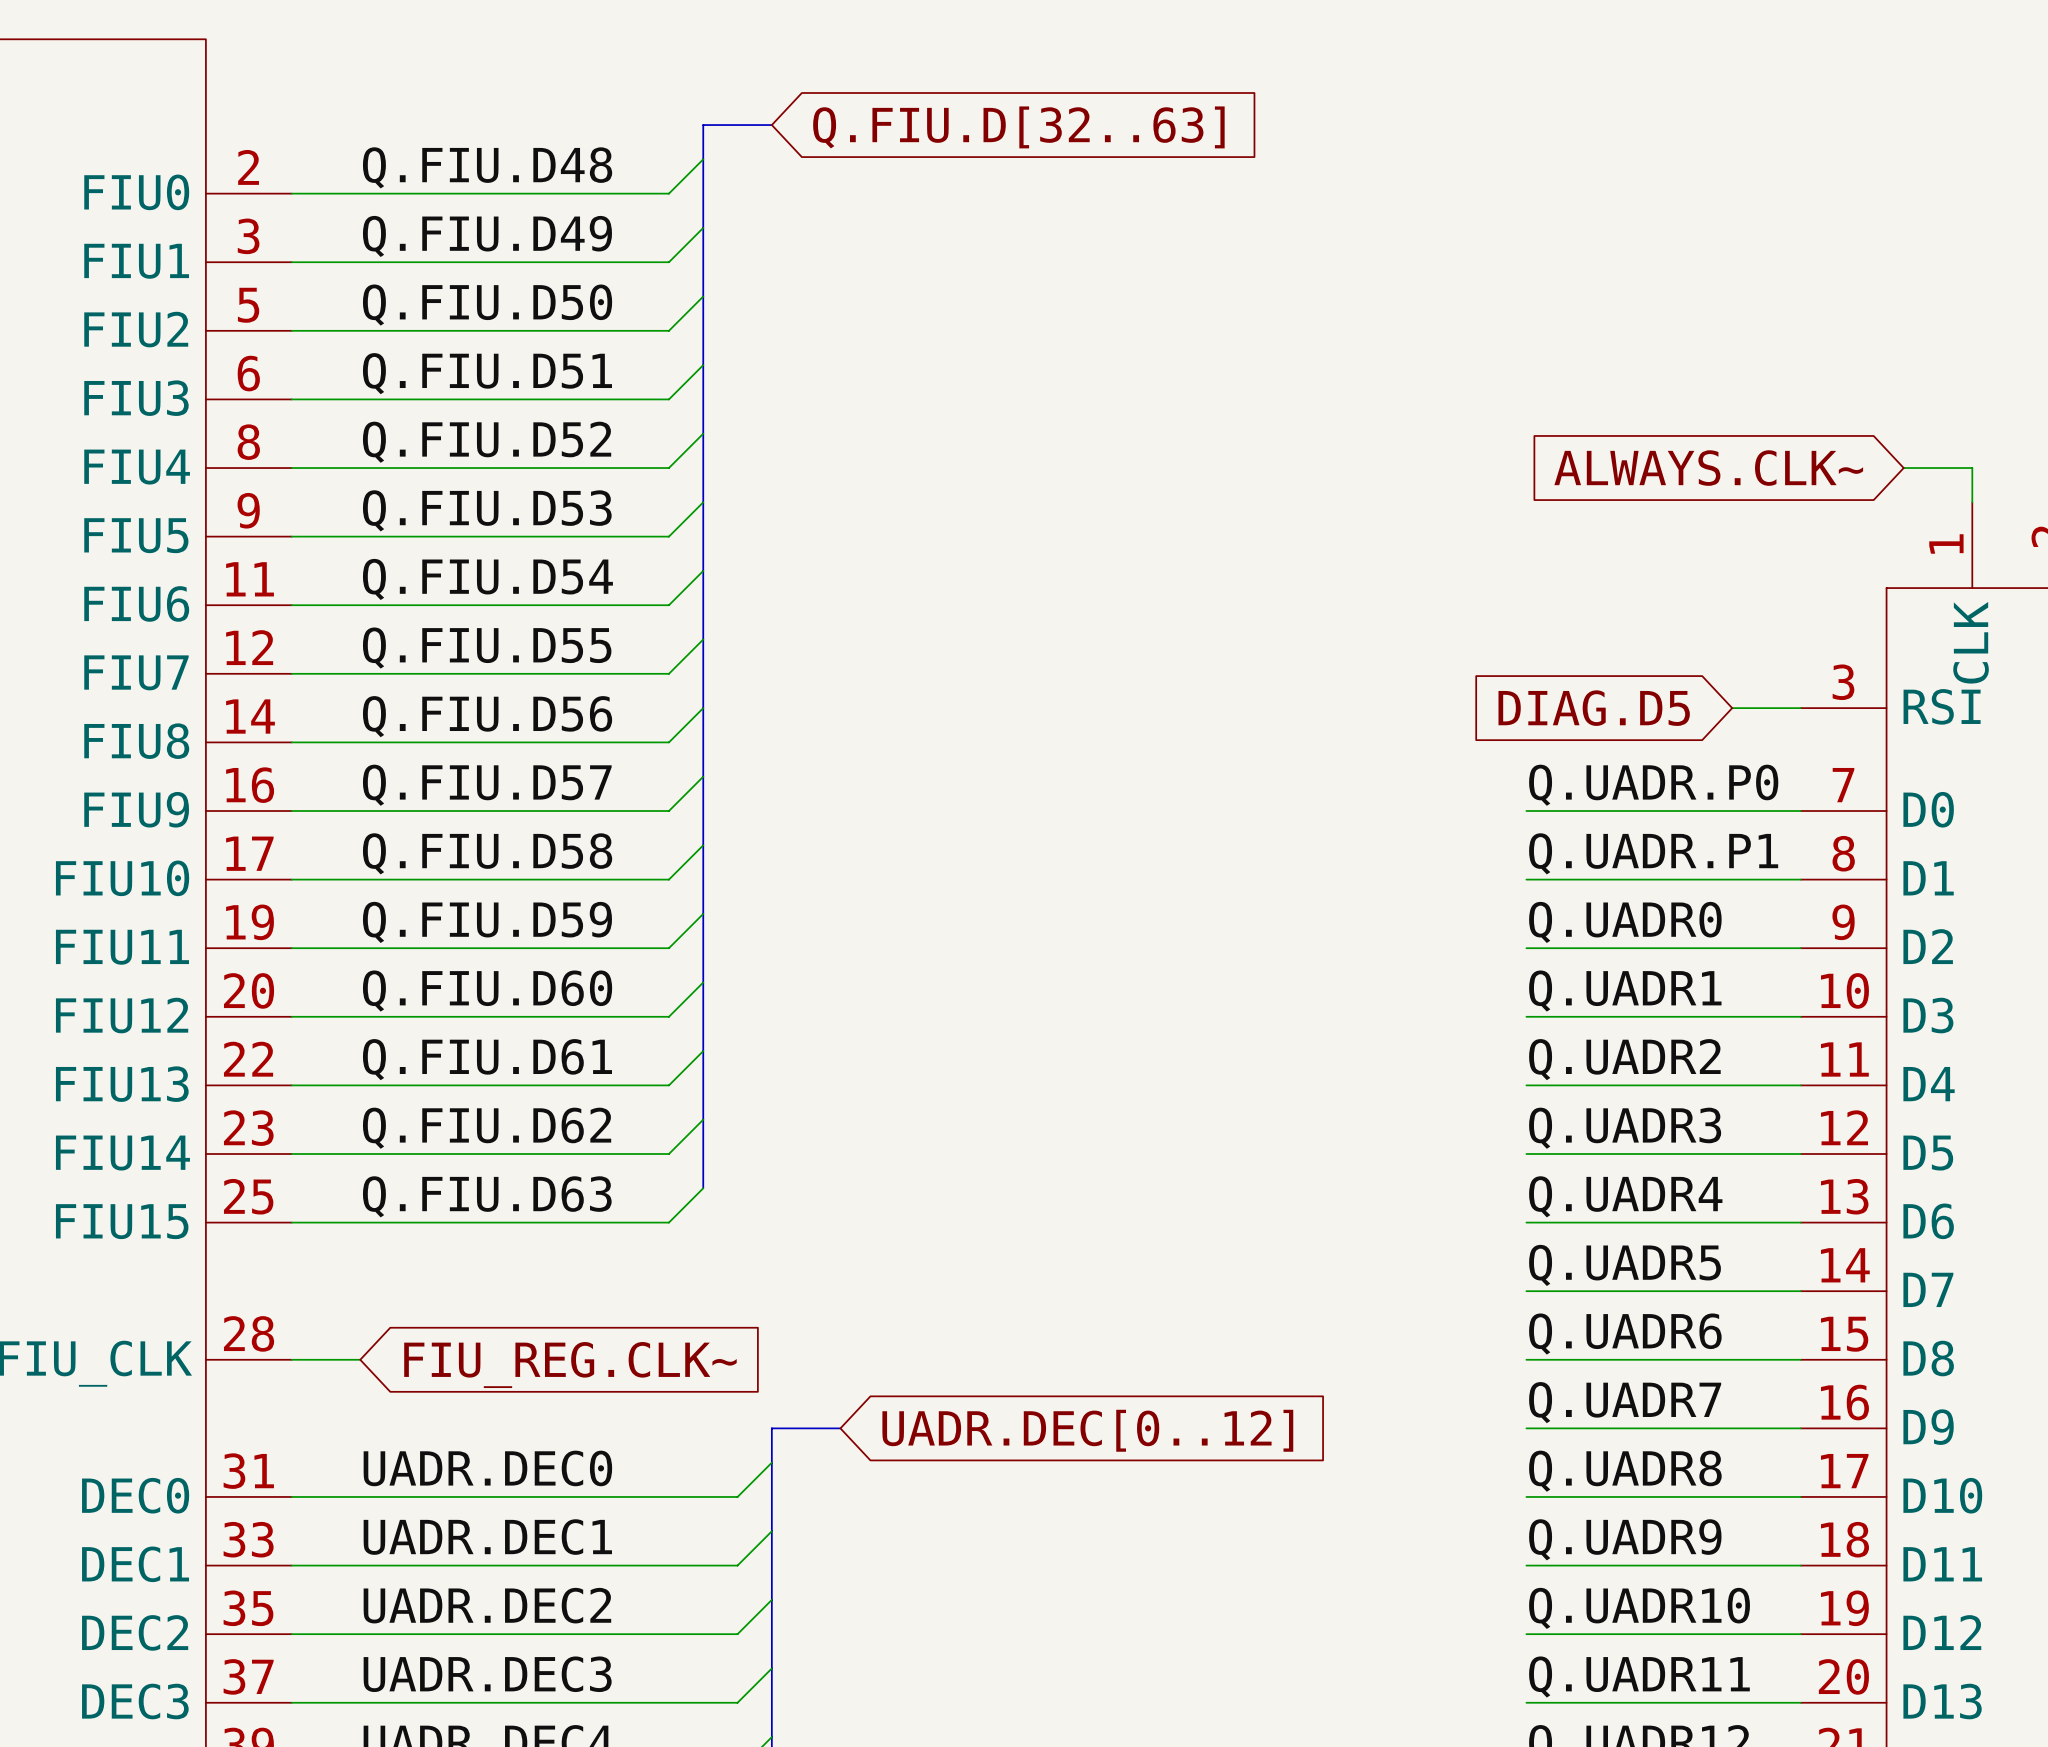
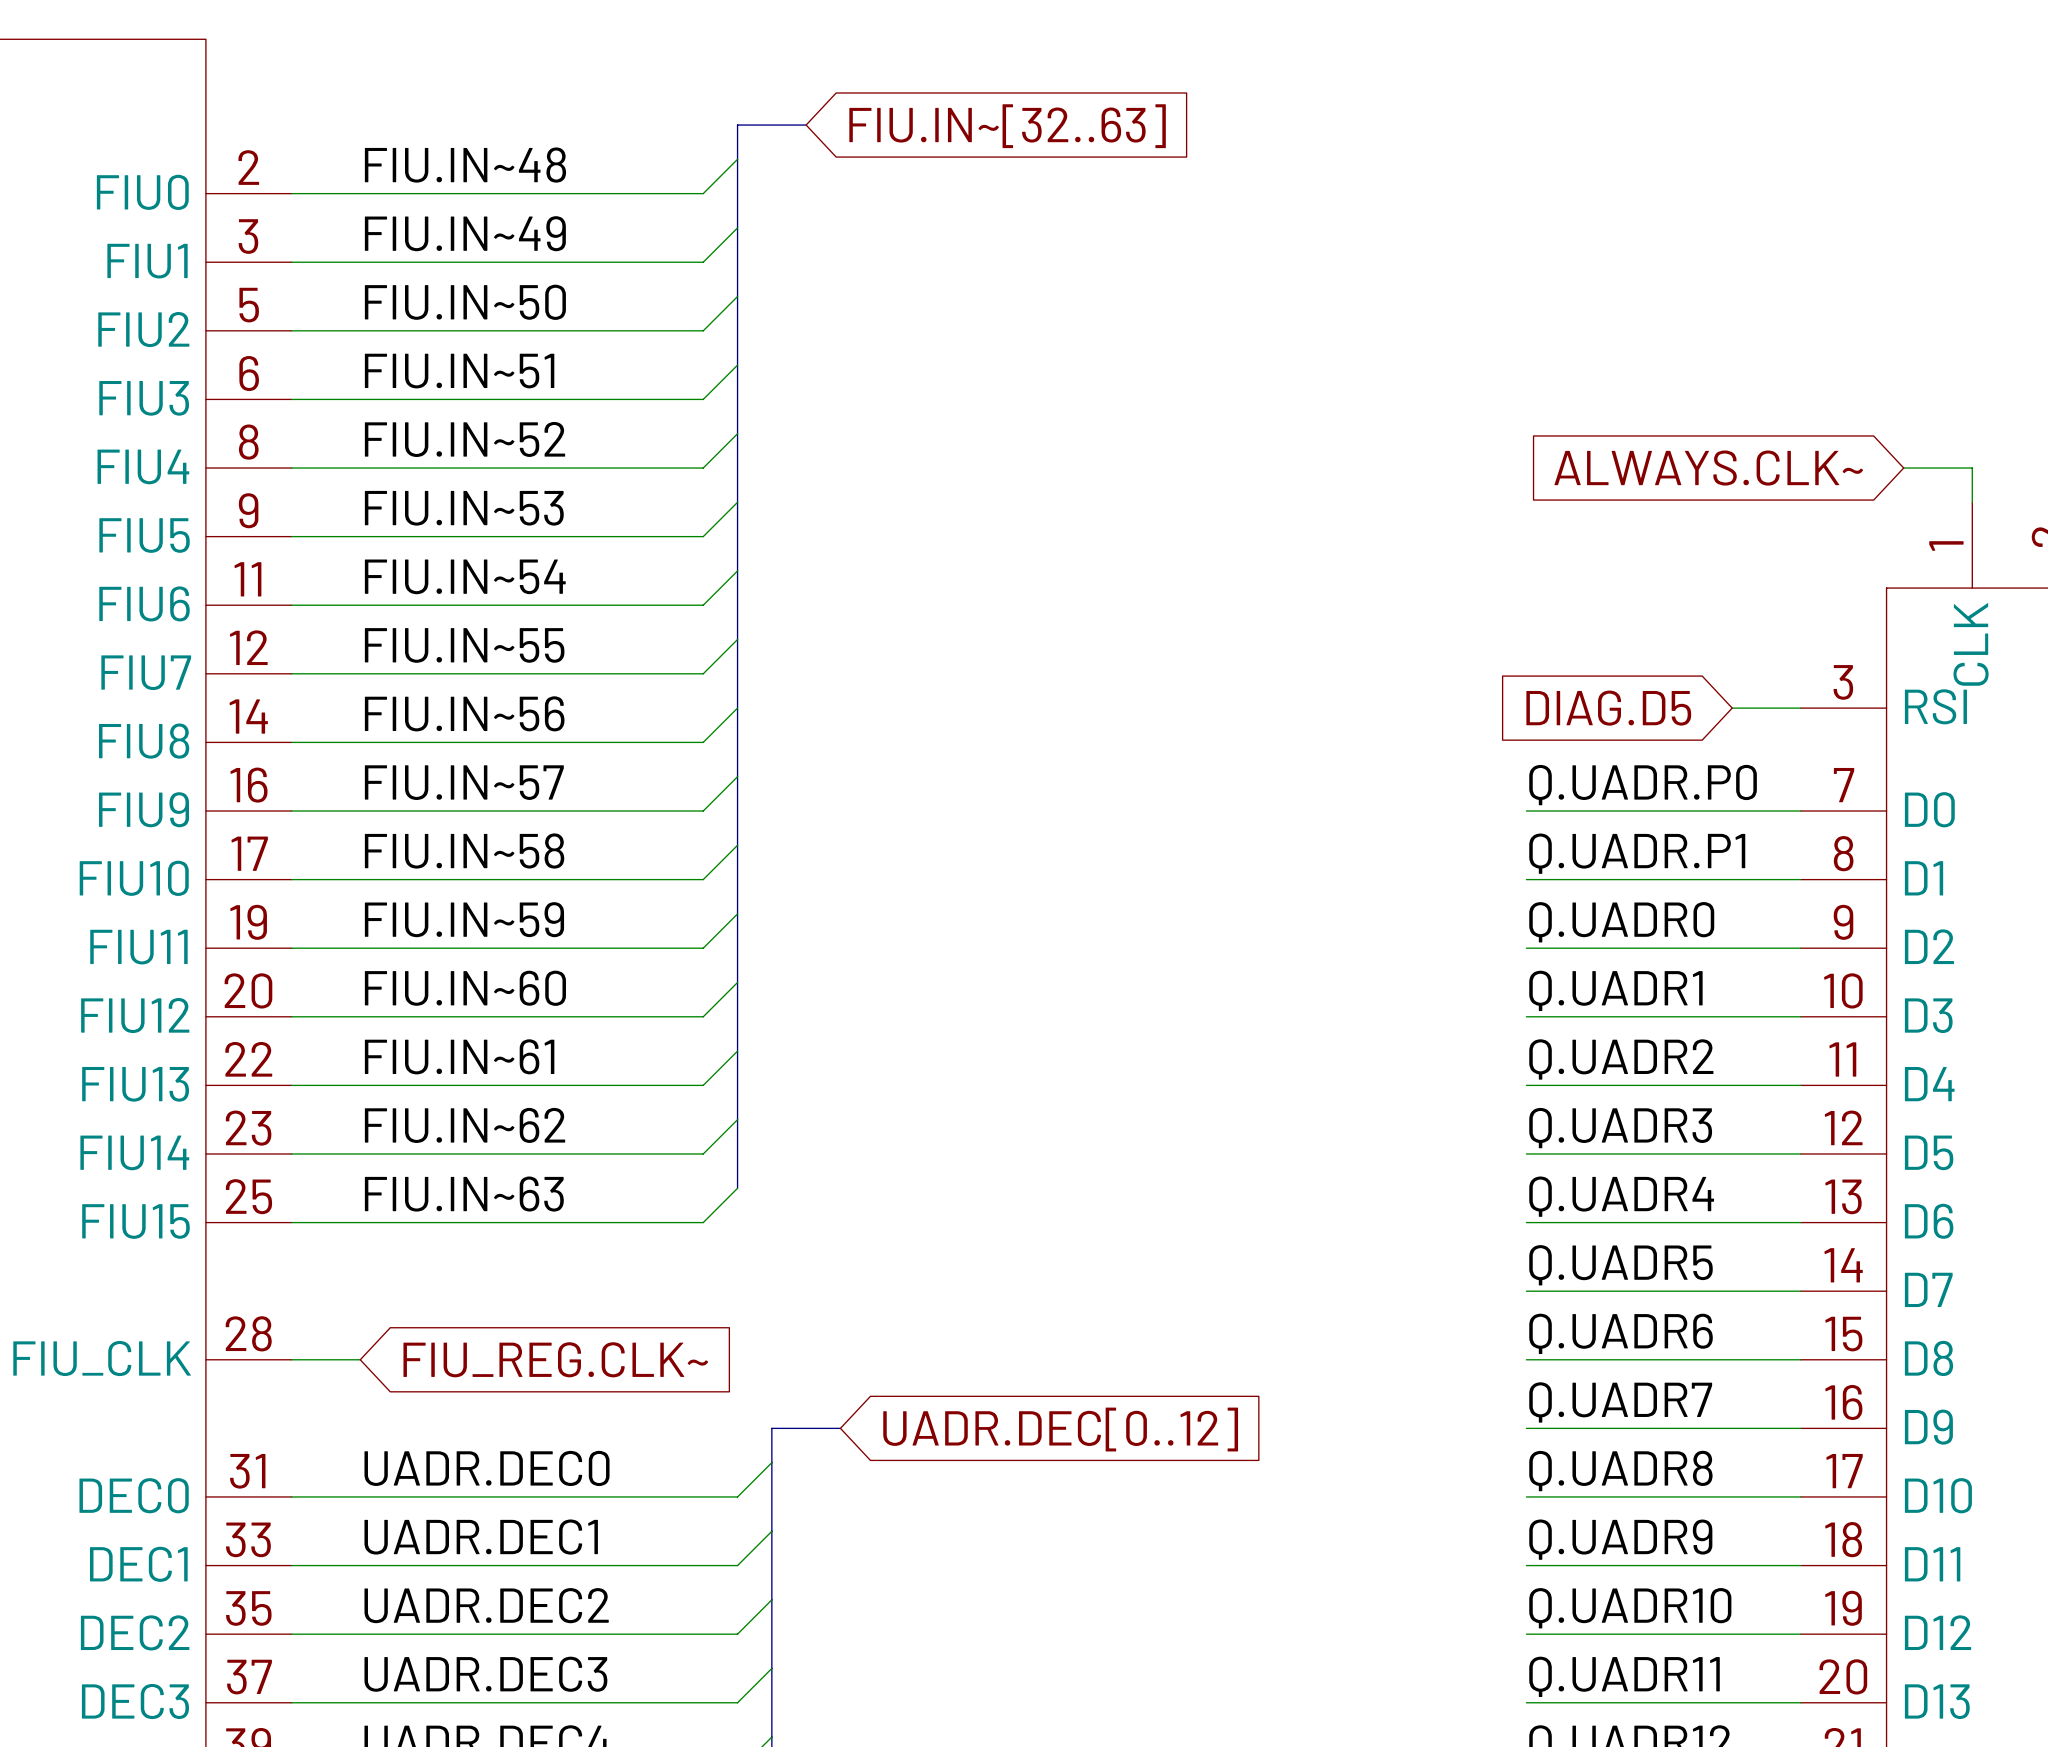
bus: (737, 125) (703, 125) (703, 1188) -> (737, 125) (737, 1188)
bus: none -> (771, 125) (806, 125)
global label: Q.FIU.D[32..63] (1018, 127) -> FIU.IN~[32..63] (1007, 126)
wire: (703, 159) (668, 193) -> (737, 159) (703, 193) (668, 193)
label: Q.FIU.D48 (487, 167) -> FIU.IN~48 (465, 165)
wire: (703, 227) (668, 262) -> (737, 227) (703, 262) (668, 262)
label: Q.FIU.D49 (487, 236) -> FIU.IN~49 (465, 233)
wire: (703, 296) (668, 330) -> (737, 296) (703, 330) (668, 330)
label: Q.FIU.D50 (487, 305) -> FIU.IN~50 (465, 302)
wire: (703, 365) (668, 399) -> (737, 365) (703, 399) (668, 399)
label: Q.FIU.D51 (487, 373) -> FIU.IN~51 (459, 371)
wire: (703, 433) (668, 468) -> (737, 433) (703, 468) (668, 468)
label: Q.FIU.D52 (487, 442) -> FIU.IN~52 (465, 439)
wire: (703, 502) (668, 536) -> (737, 502) (703, 536) (668, 536)
label: Q.FIU.D53 (487, 510) -> FIU.IN~53 (464, 508)
wire: (703, 570) (668, 605) -> (737, 570) (703, 605) (668, 605)
label: Q.FIU.D54 (487, 579) -> FIU.IN~54 (465, 576)
wire: (703, 639) (668, 673) -> (737, 639) (703, 673) (668, 673)
label: Q.FIU.D55 (487, 648) -> FIU.IN~55 (464, 645)
wire: (703, 708) (668, 742) -> (737, 708) (703, 742) (668, 742)
label: Q.FIU.D56 (487, 716) -> FIU.IN~56 (464, 713)
wire: (703, 776) (668, 811) -> (737, 776) (703, 811) (668, 811)
label: Q.FIU.D57 (487, 785) -> FIU.IN~57 (464, 782)
wire: (703, 845) (668, 879) -> (737, 845) (703, 879) (668, 879)
label: Q.FIU.D58 (487, 853) -> FIU.IN~58 (464, 851)
wire: (703, 913) (668, 948) -> (737, 913) (703, 948) (668, 948)
label: Q.FIU.D59 (487, 922) -> FIU.IN~59 (464, 919)
wire: (703, 982) (668, 1016) -> (737, 982) (703, 1016) (668, 1016)
label: Q.FIU.D60 (487, 991) -> FIU.IN~60 (465, 988)
wire: (703, 1051) (668, 1085) -> (737, 1051) (703, 1085) (668, 1085)
label: Q.FIU.D61 (487, 1059) -> FIU.IN~61 (459, 1056)
wire: (703, 1119) (668, 1153) -> (737, 1119) (703, 1153) (668, 1153)
label: Q.FIU.D62 (487, 1128) -> FIU.IN~62 (465, 1125)
wire: (703, 1188) (668, 1222) -> (737, 1188) (703, 1222) (668, 1222)
label: Q.FIU.D63 (487, 1196) -> FIU.IN~63 (464, 1194)

